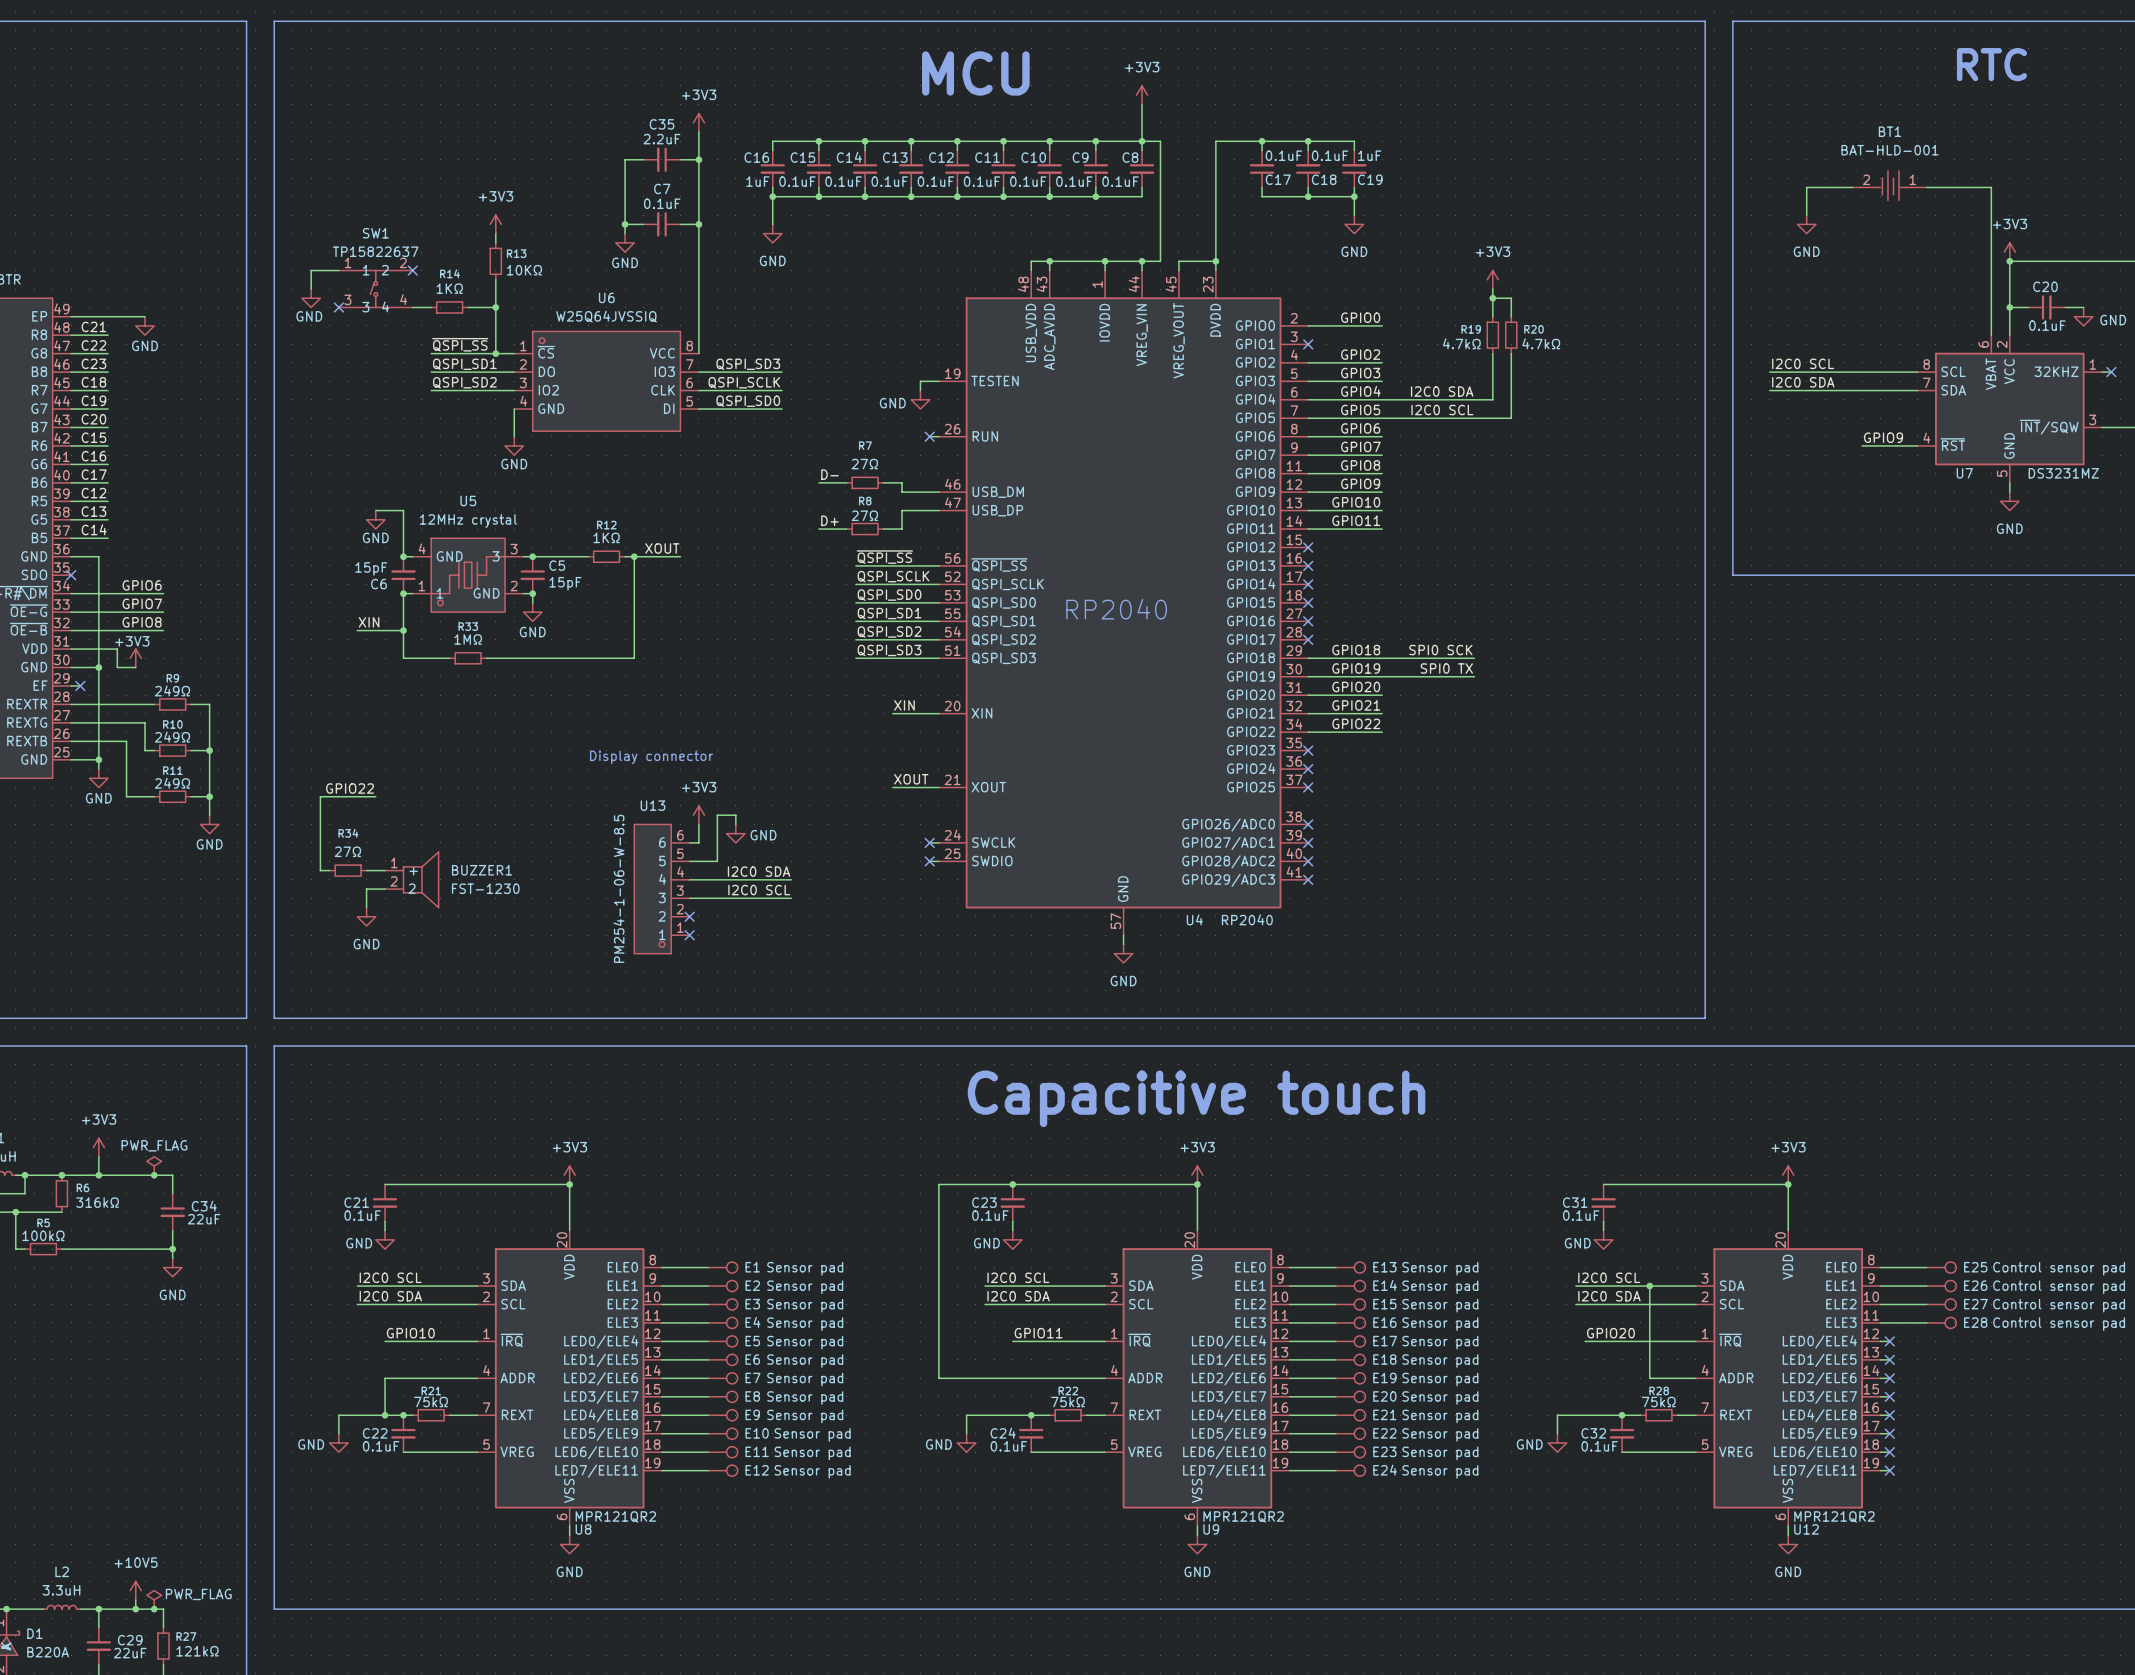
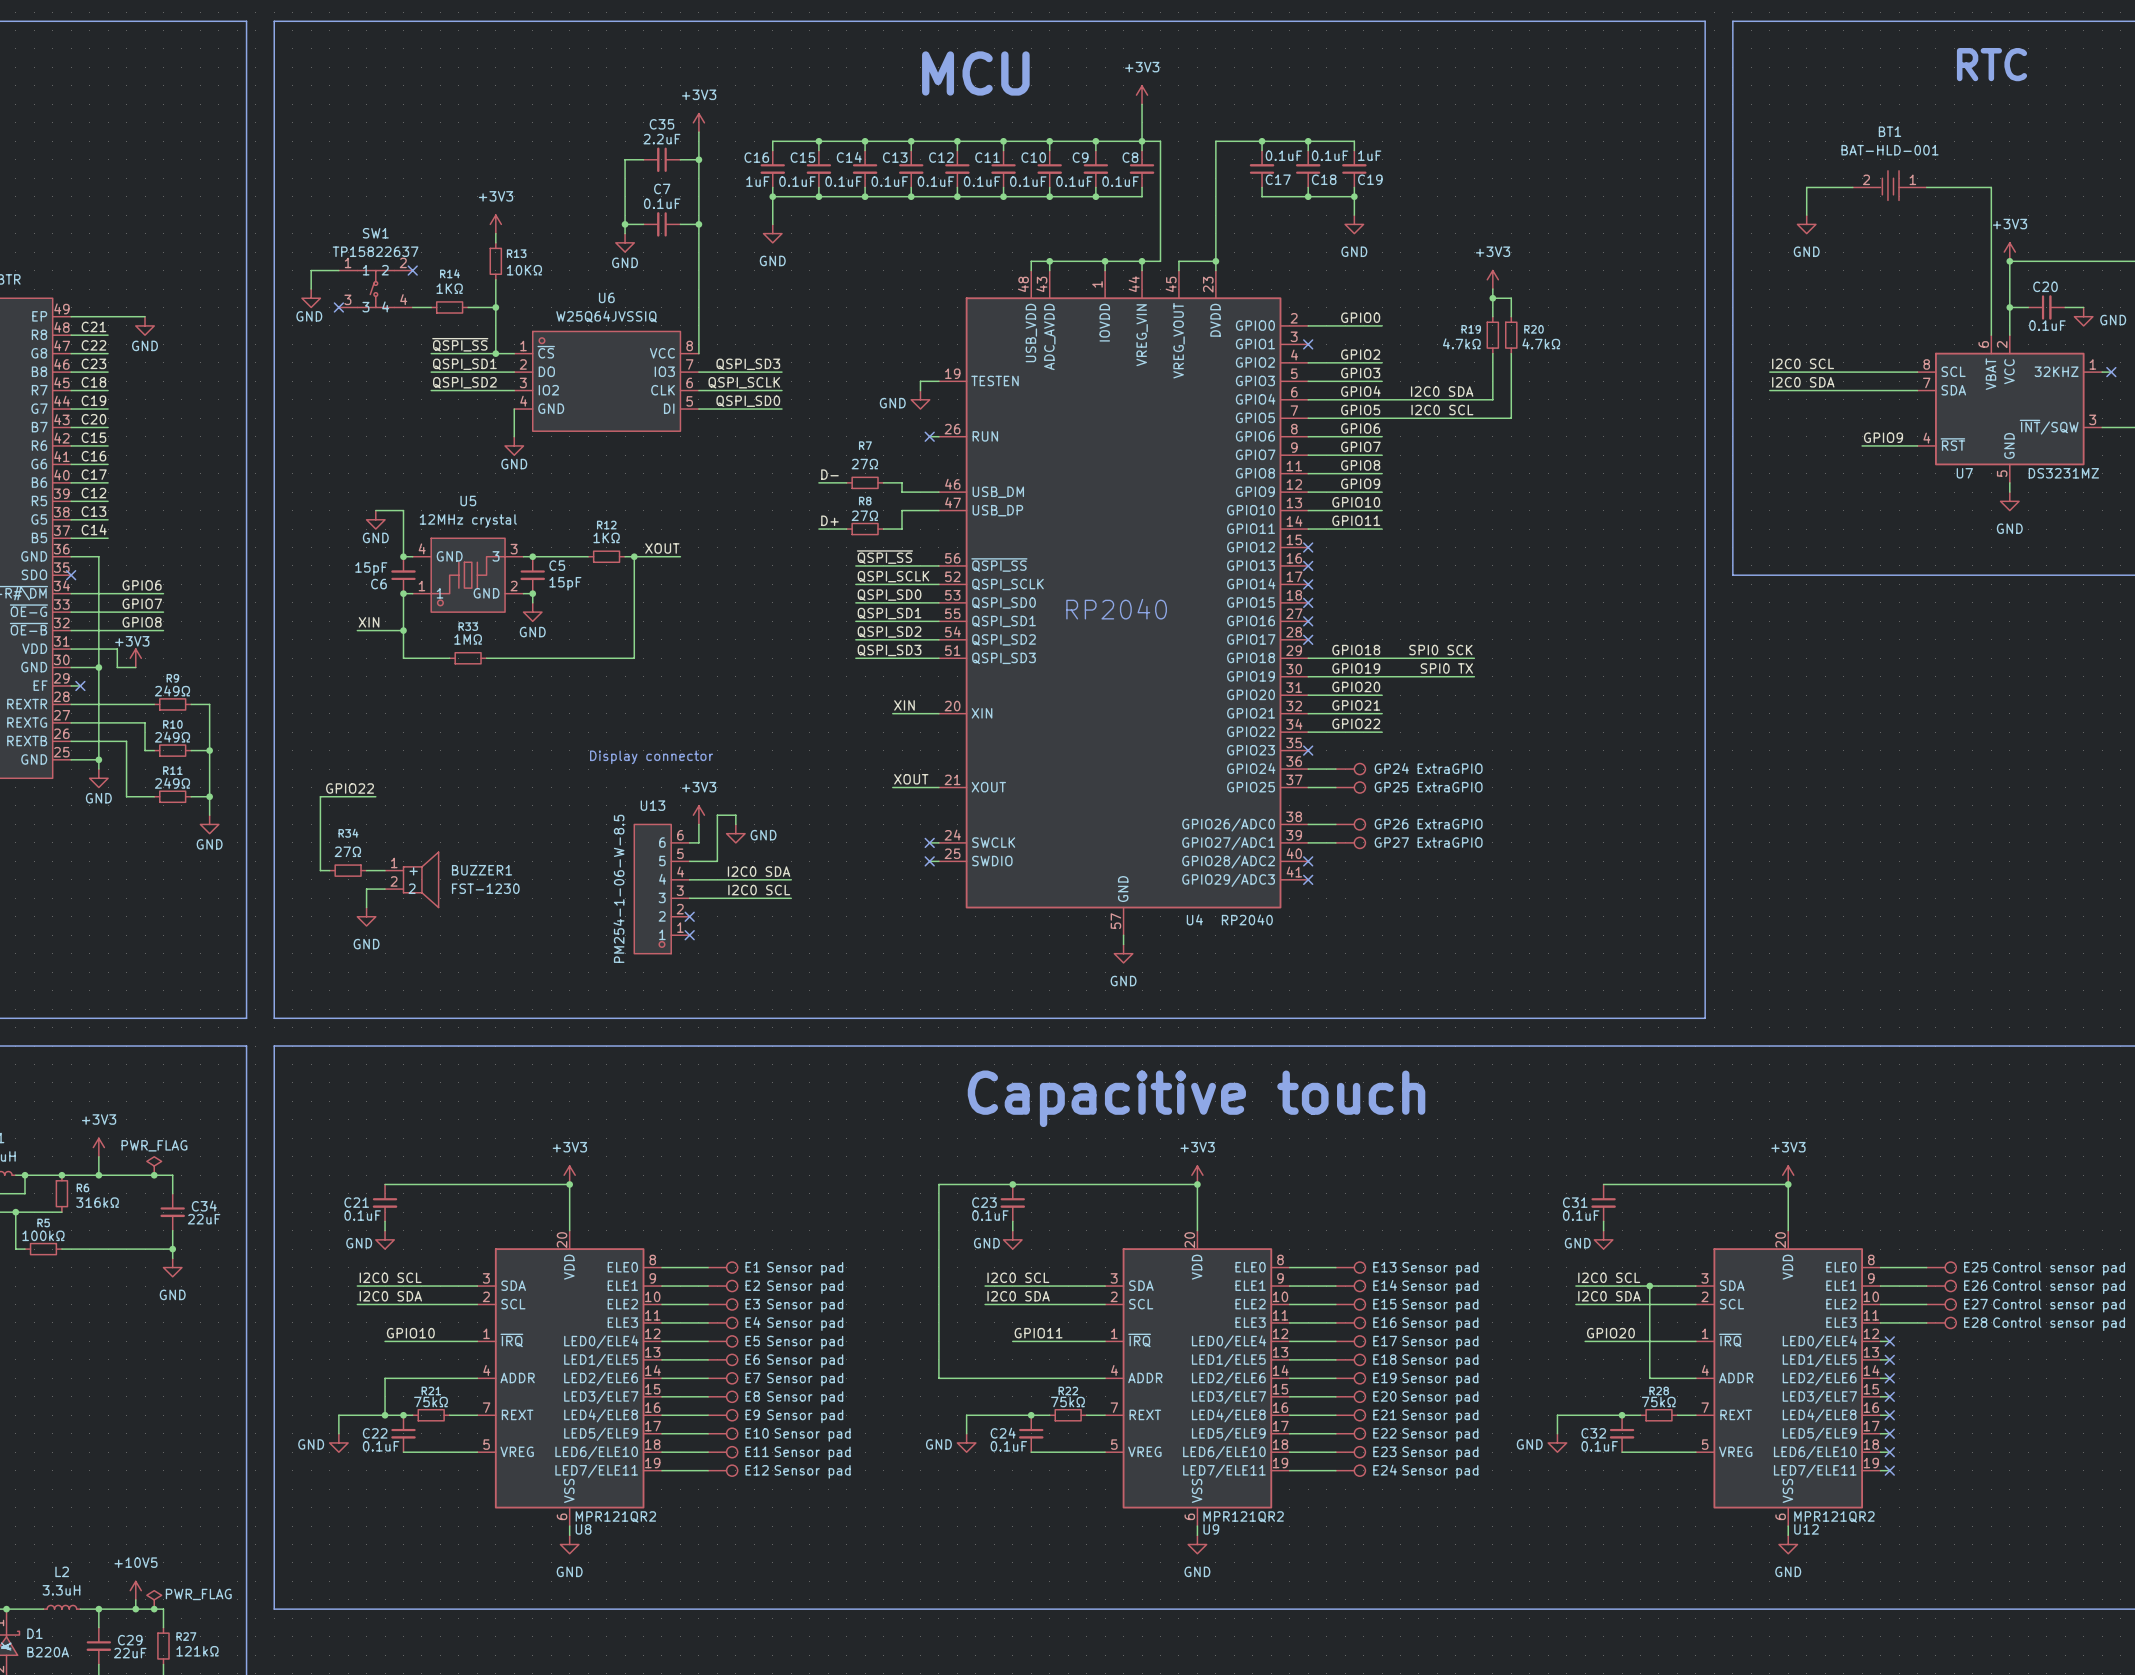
wire: none -> (1308, 769) (1335, 769)
no-connect mark: (1308, 769) -> none
GP24: none -> ExtraGPIO (1350, 769)
wire: none -> (1308, 787) (1335, 787)
no-connect mark: (1308, 787) -> none
GP25: none -> ExtraGPIO (1350, 787)
wire: none -> (1308, 824) (1335, 824)
no-connect mark: (1308, 824) -> none
GP26: none -> ExtraGPIO (1350, 824)
wire: none -> (1308, 842) (1335, 842)
no-connect mark: (1308, 842) -> none
GP27: none -> ExtraGPIO (1350, 842)

